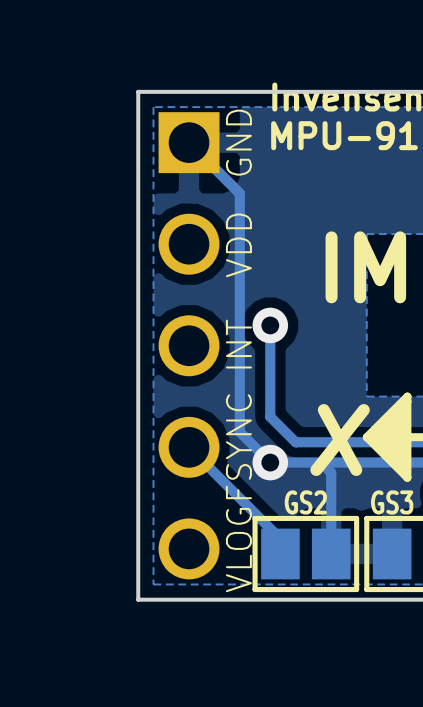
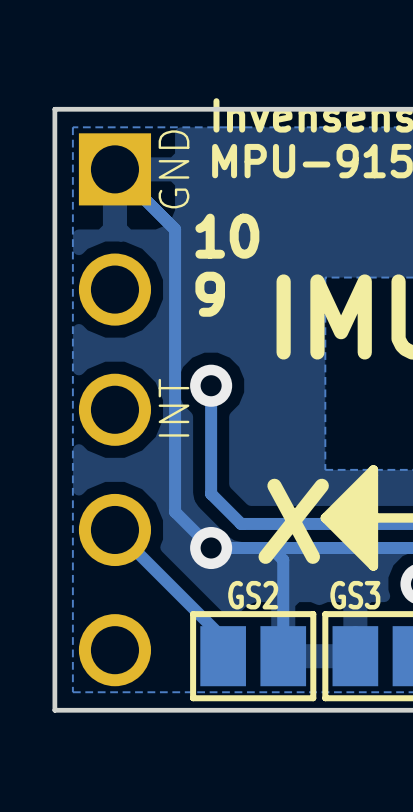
text: none -> 10 (227, 236)
text: VDD (238, 245) -> 9 (210, 294)
text: FSYNC (238, 446) -> none
text: VLOG (238, 550) -> none

